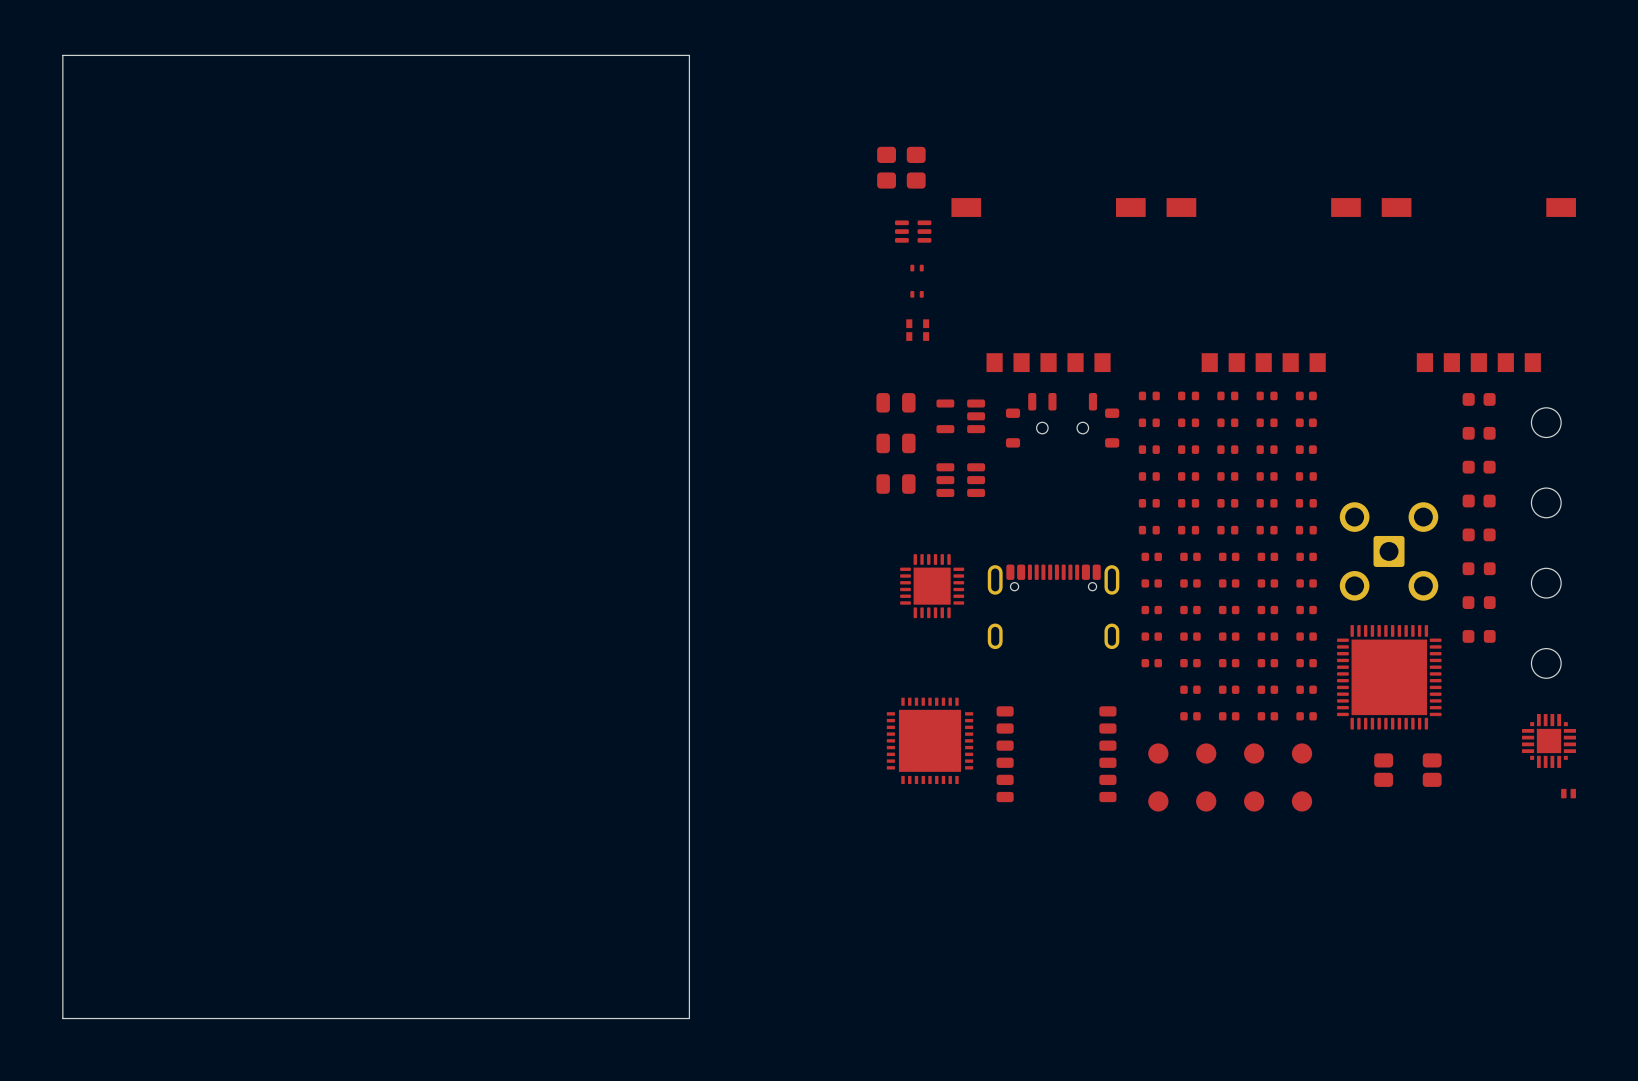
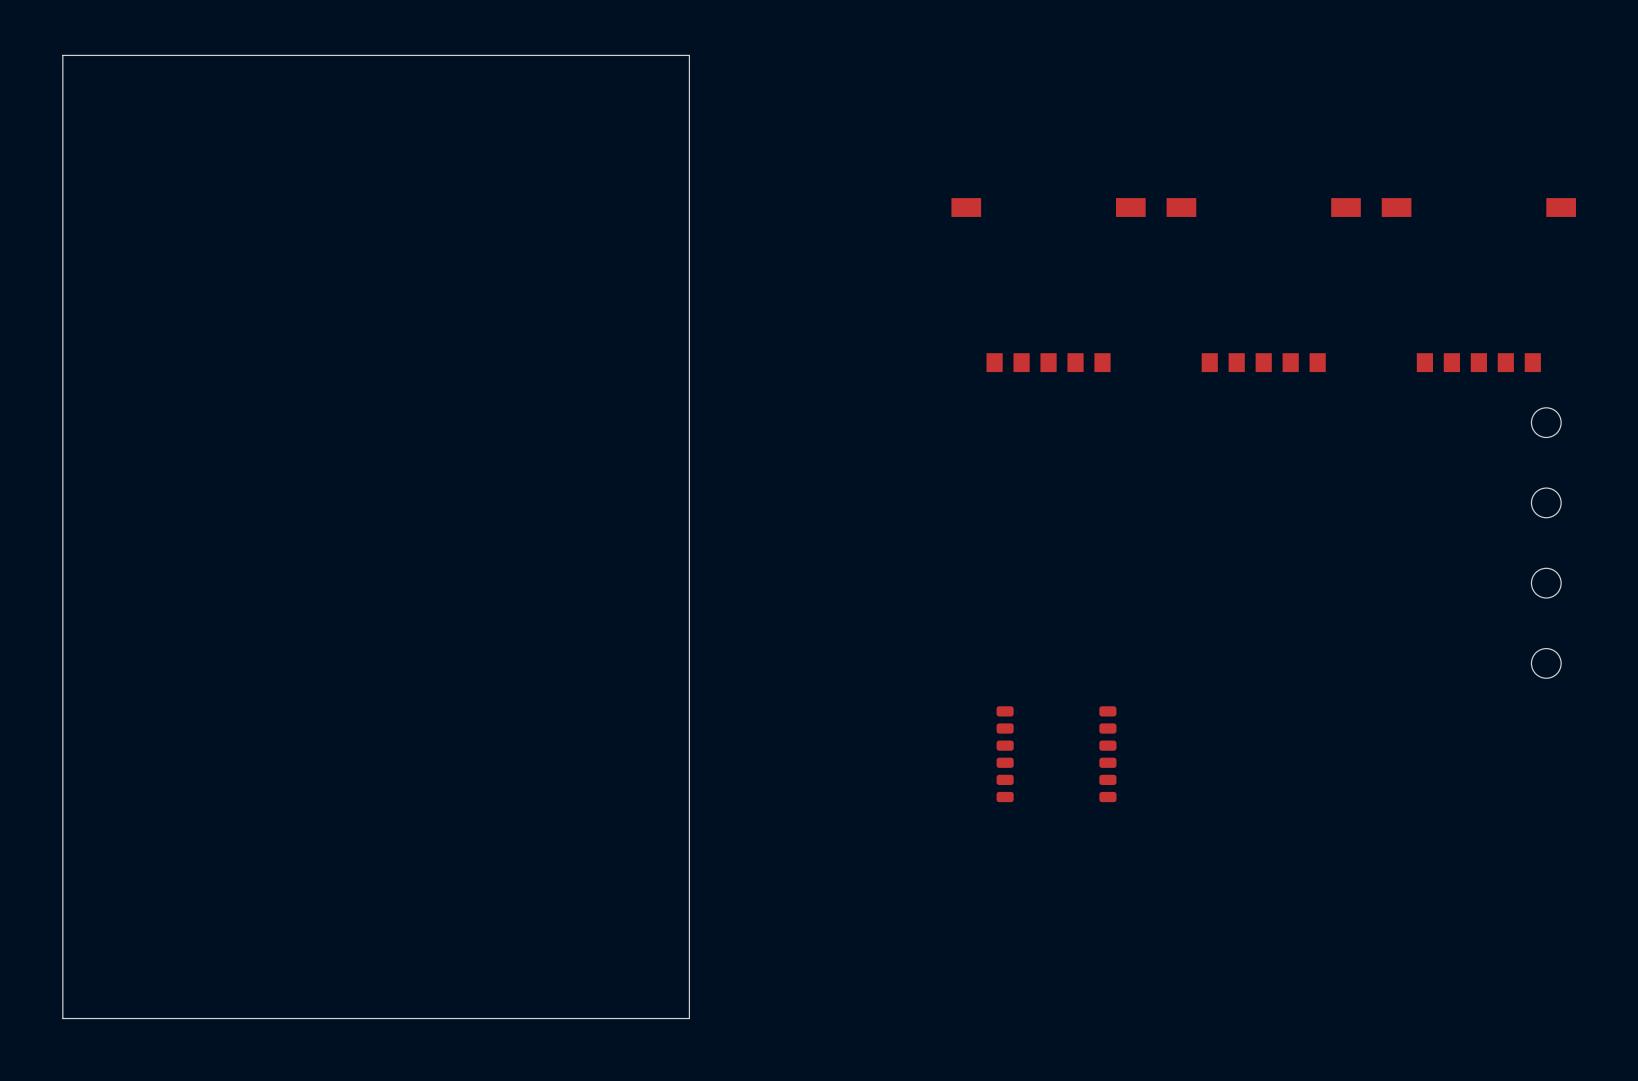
part: (901, 167) -> none
part: (913, 231) -> none
part: (917, 268) -> none
part: (917, 294) -> none
part: (917, 330) -> none
part: (1149, 395) -> none
part: (1188, 395) -> none
part: (1227, 395) -> none
part: (1267, 395) -> none
part: (1306, 395) -> none
part: (1479, 399) -> none
part: (895, 402) -> none
part: (960, 416) -> none
part: (1062, 420) -> none
part: (1149, 422) -> none
part: (1188, 422) -> none
part: (1227, 422) -> none
part: (1267, 422) -> none
part: (1306, 422) -> none
part: (1479, 433) -> none
part: (895, 443) -> none
part: (1149, 449) -> none
part: (1188, 449) -> none
part: (1227, 449) -> none
part: (1267, 449) -> none
part: (1306, 449) -> none
part: (1479, 467) -> none
part: (1149, 476) -> none
part: (1188, 476) -> none
part: (1227, 476) -> none
part: (1267, 476) -> none
part: (1306, 476) -> none
part: (960, 480) -> none
part: (895, 484) -> none
part: (1479, 501) -> none
part: (1149, 503) -> none
part: (1188, 503) -> none
part: (1227, 503) -> none
part: (1267, 503) -> none
part: (1306, 503) -> none
part: (1149, 530) -> none
part: (1188, 530) -> none
part: (1227, 530) -> none
part: (1267, 530) -> none
part: (1306, 530) -> none
part: (1479, 534) -> none
part: (1389, 551) -> none
part: (1151, 556) -> none
part: (1190, 556) -> none
part: (1229, 556) -> none
part: (1267, 556) -> none
part: (1306, 556) -> none
part: (1479, 568) -> none
part: (1151, 583) -> none
part: (1190, 583) -> none
part: (1229, 583) -> none
part: (1267, 583) -> none
part: (1306, 583) -> none
part: (932, 586) -> none
part: (1479, 602) -> none
part: (1053, 606) -> none
part: (1151, 610) -> none
part: (1190, 610) -> none
part: (1229, 610) -> none
part: (1267, 610) -> none
part: (1306, 610) -> none
part: (1151, 636) -> none
part: (1190, 636) -> none
part: (1229, 636) -> none
part: (1267, 636) -> none
part: (1306, 636) -> none
part: (1479, 636) -> none
part: (1151, 663) -> none
part: (1190, 663) -> none
part: (1229, 663) -> none
part: (1267, 663) -> none
part: (1306, 663) -> none
part: (1389, 677) -> none
part: (1190, 689) -> none
part: (1229, 689) -> none
part: (1267, 689) -> none
part: (1306, 689) -> none
part: (1190, 716) -> none
part: (1229, 716) -> none
part: (1267, 716) -> none
part: (1306, 716) -> none
part: (929, 740) -> none
part: (1549, 740) -> none
part: (1158, 753) -> none
part: (1206, 753) -> none
part: (1254, 753) -> none
part: (1302, 753) -> none
part: (1407, 770) -> none
part: (1568, 793) -> none
part: (1158, 801) -> none
part: (1206, 801) -> none
part: (1254, 801) -> none
part: (1302, 801) -> none

